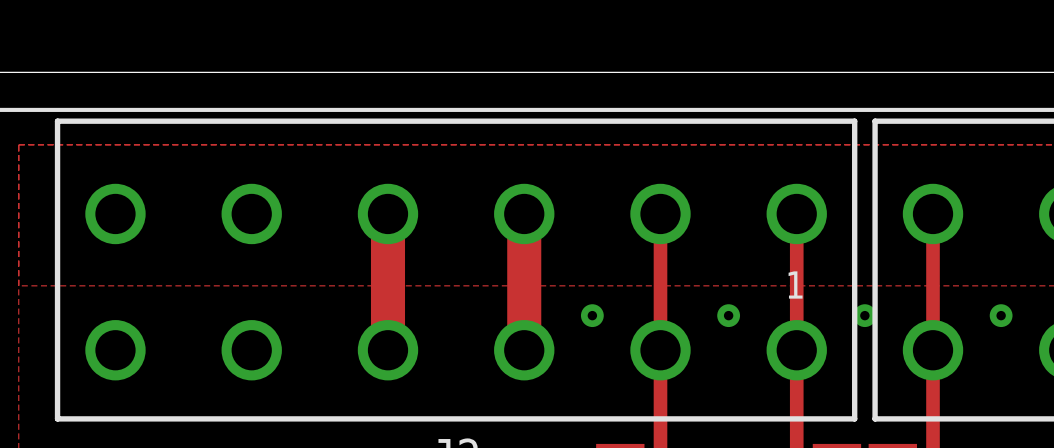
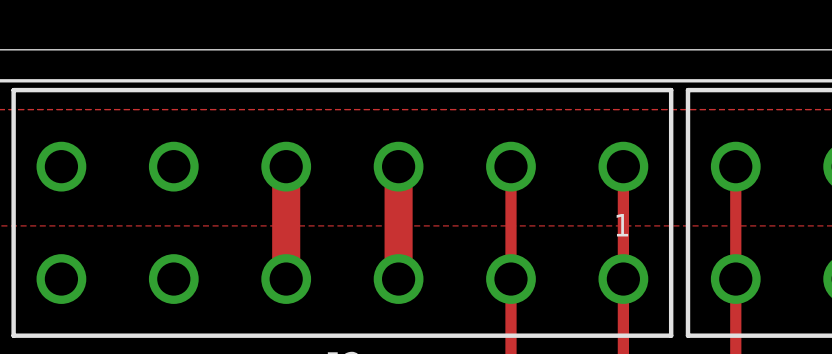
via: (592, 315) -> none
via: (728, 315) -> none
via: (864, 315) -> none
via: (1001, 315) -> none

